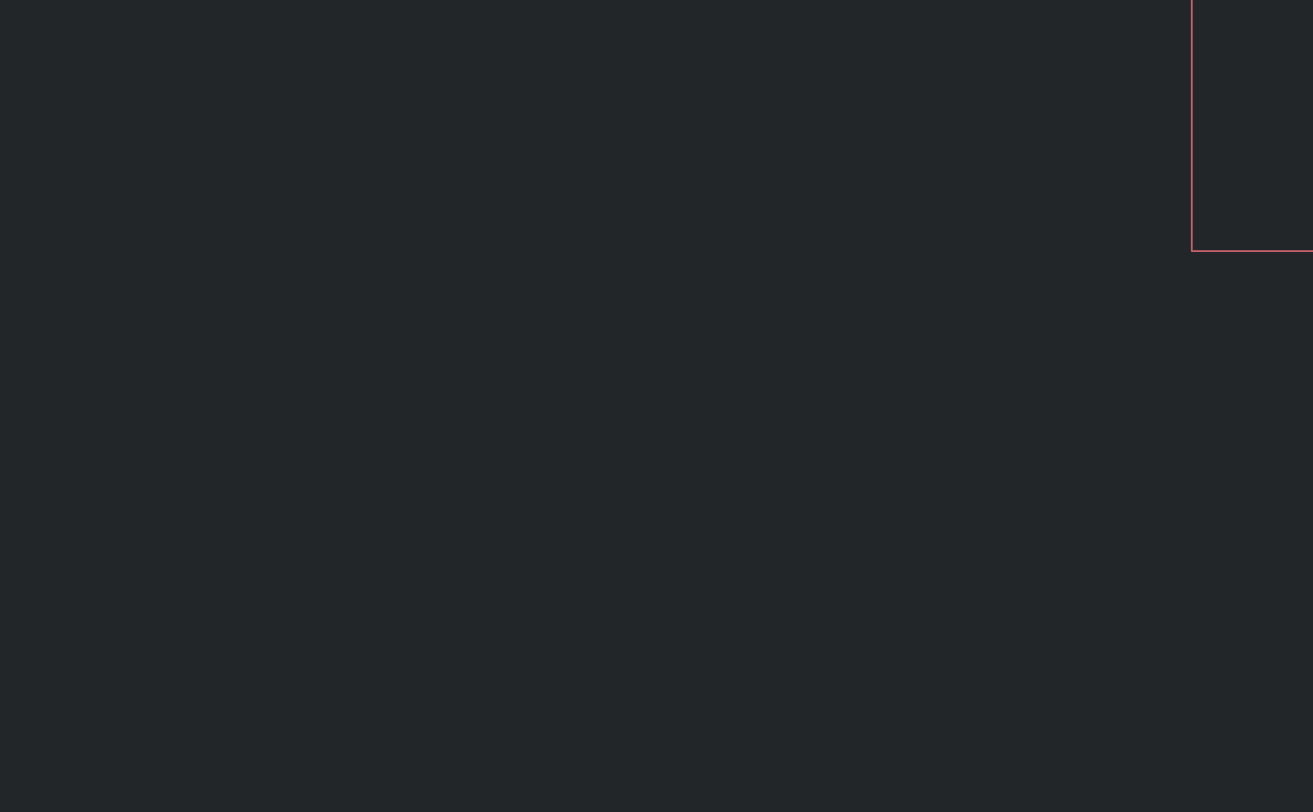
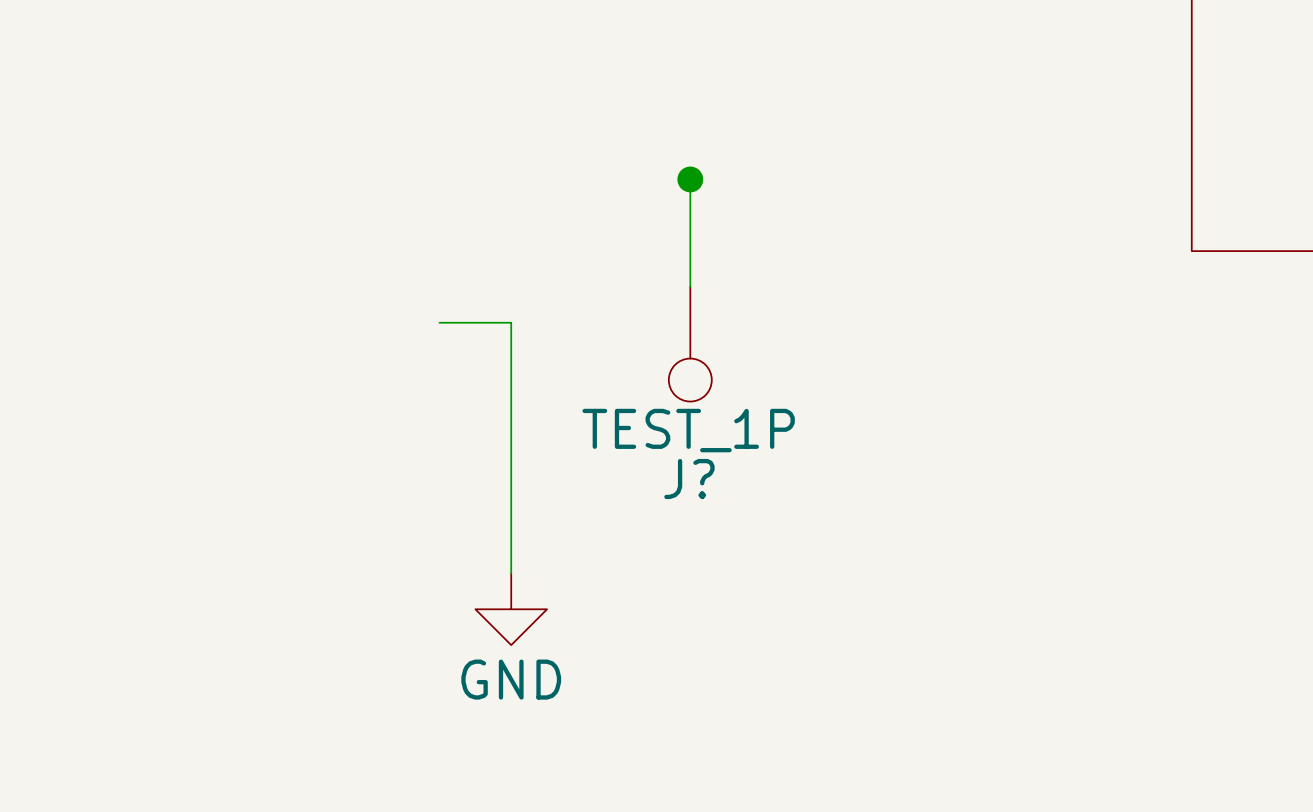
wire: none -> (690, 179) (690, 286)
junction: none -> (690, 179)
wire: none -> (439, 322) (511, 322) (511, 573)
J?: none -> TEST_1P (690, 344)
power symbol: none -> GND (511, 609)

